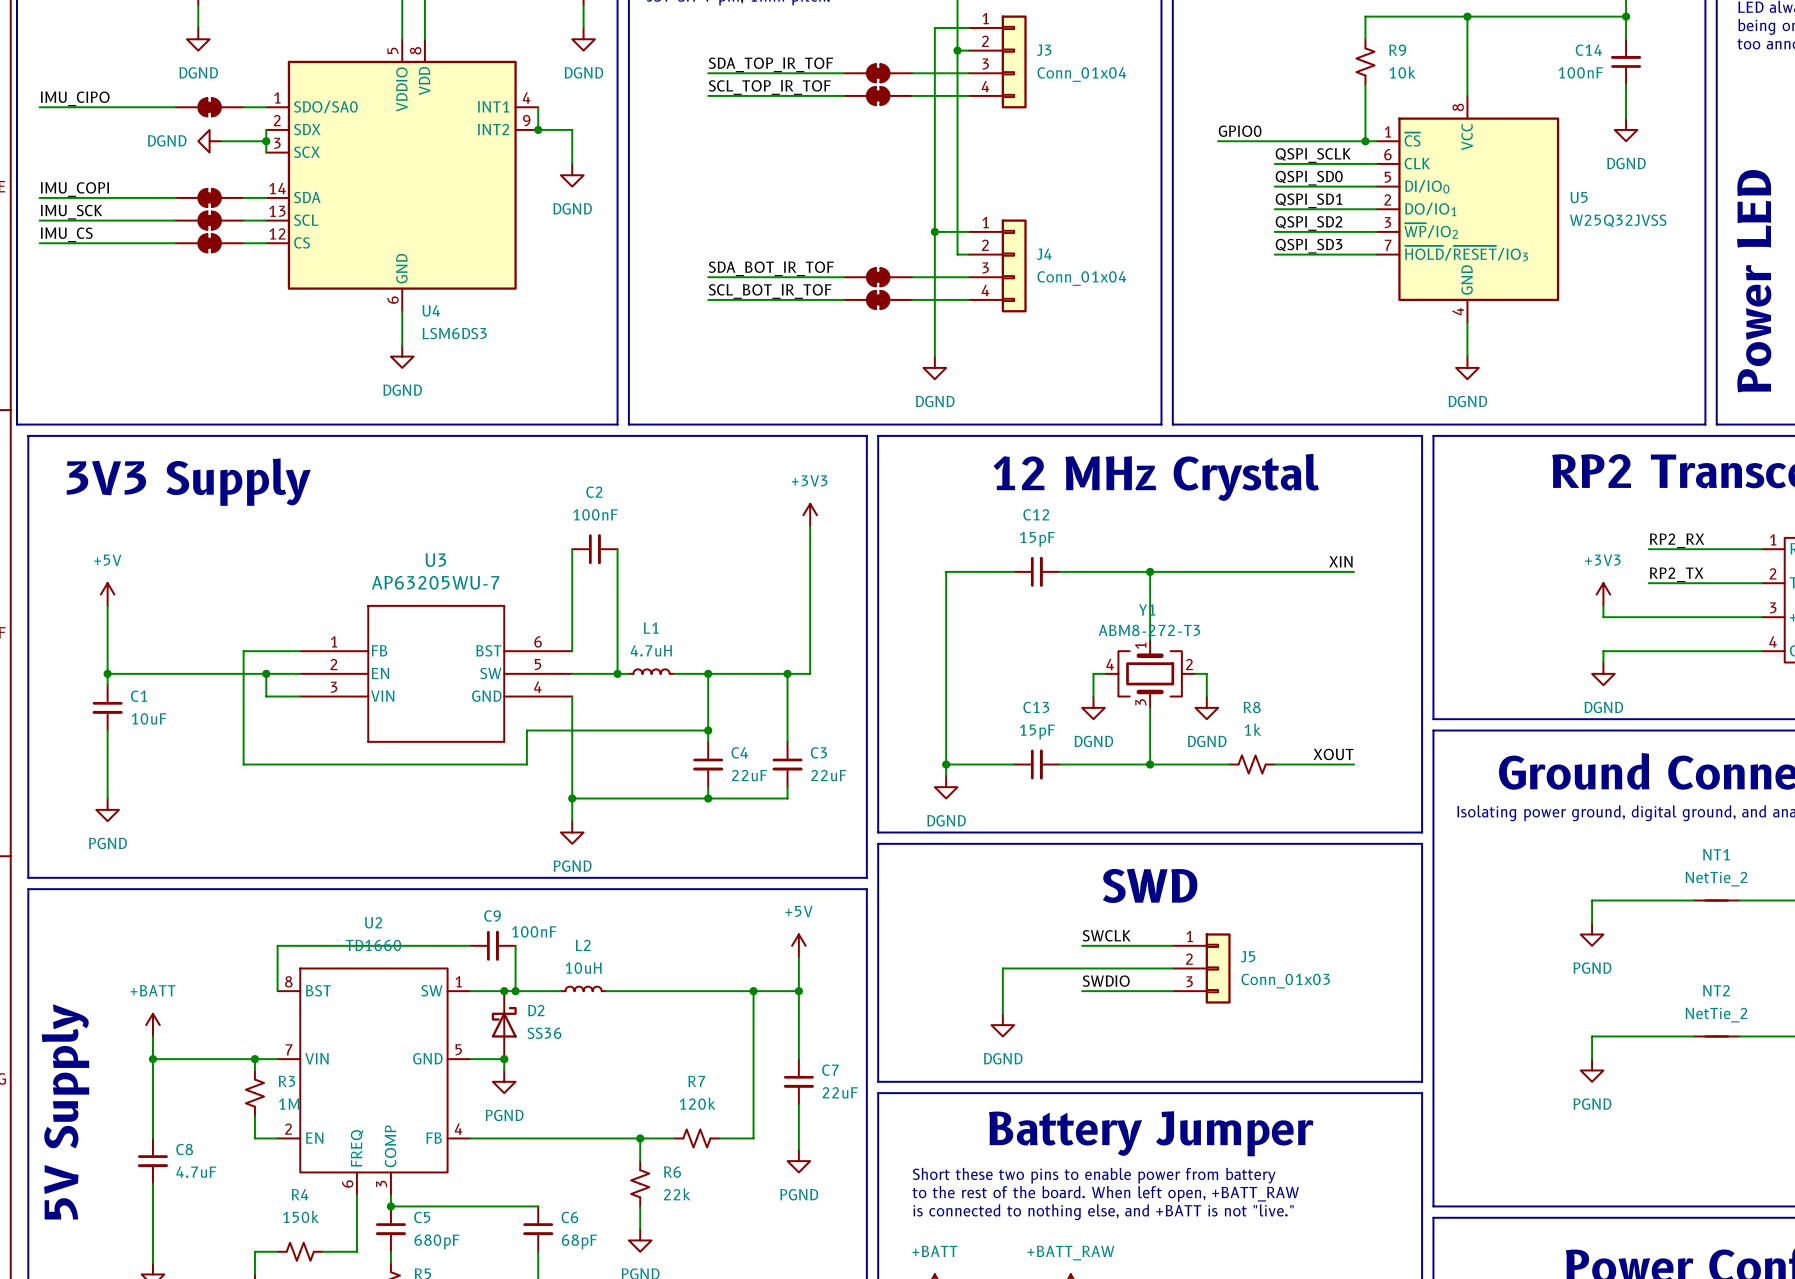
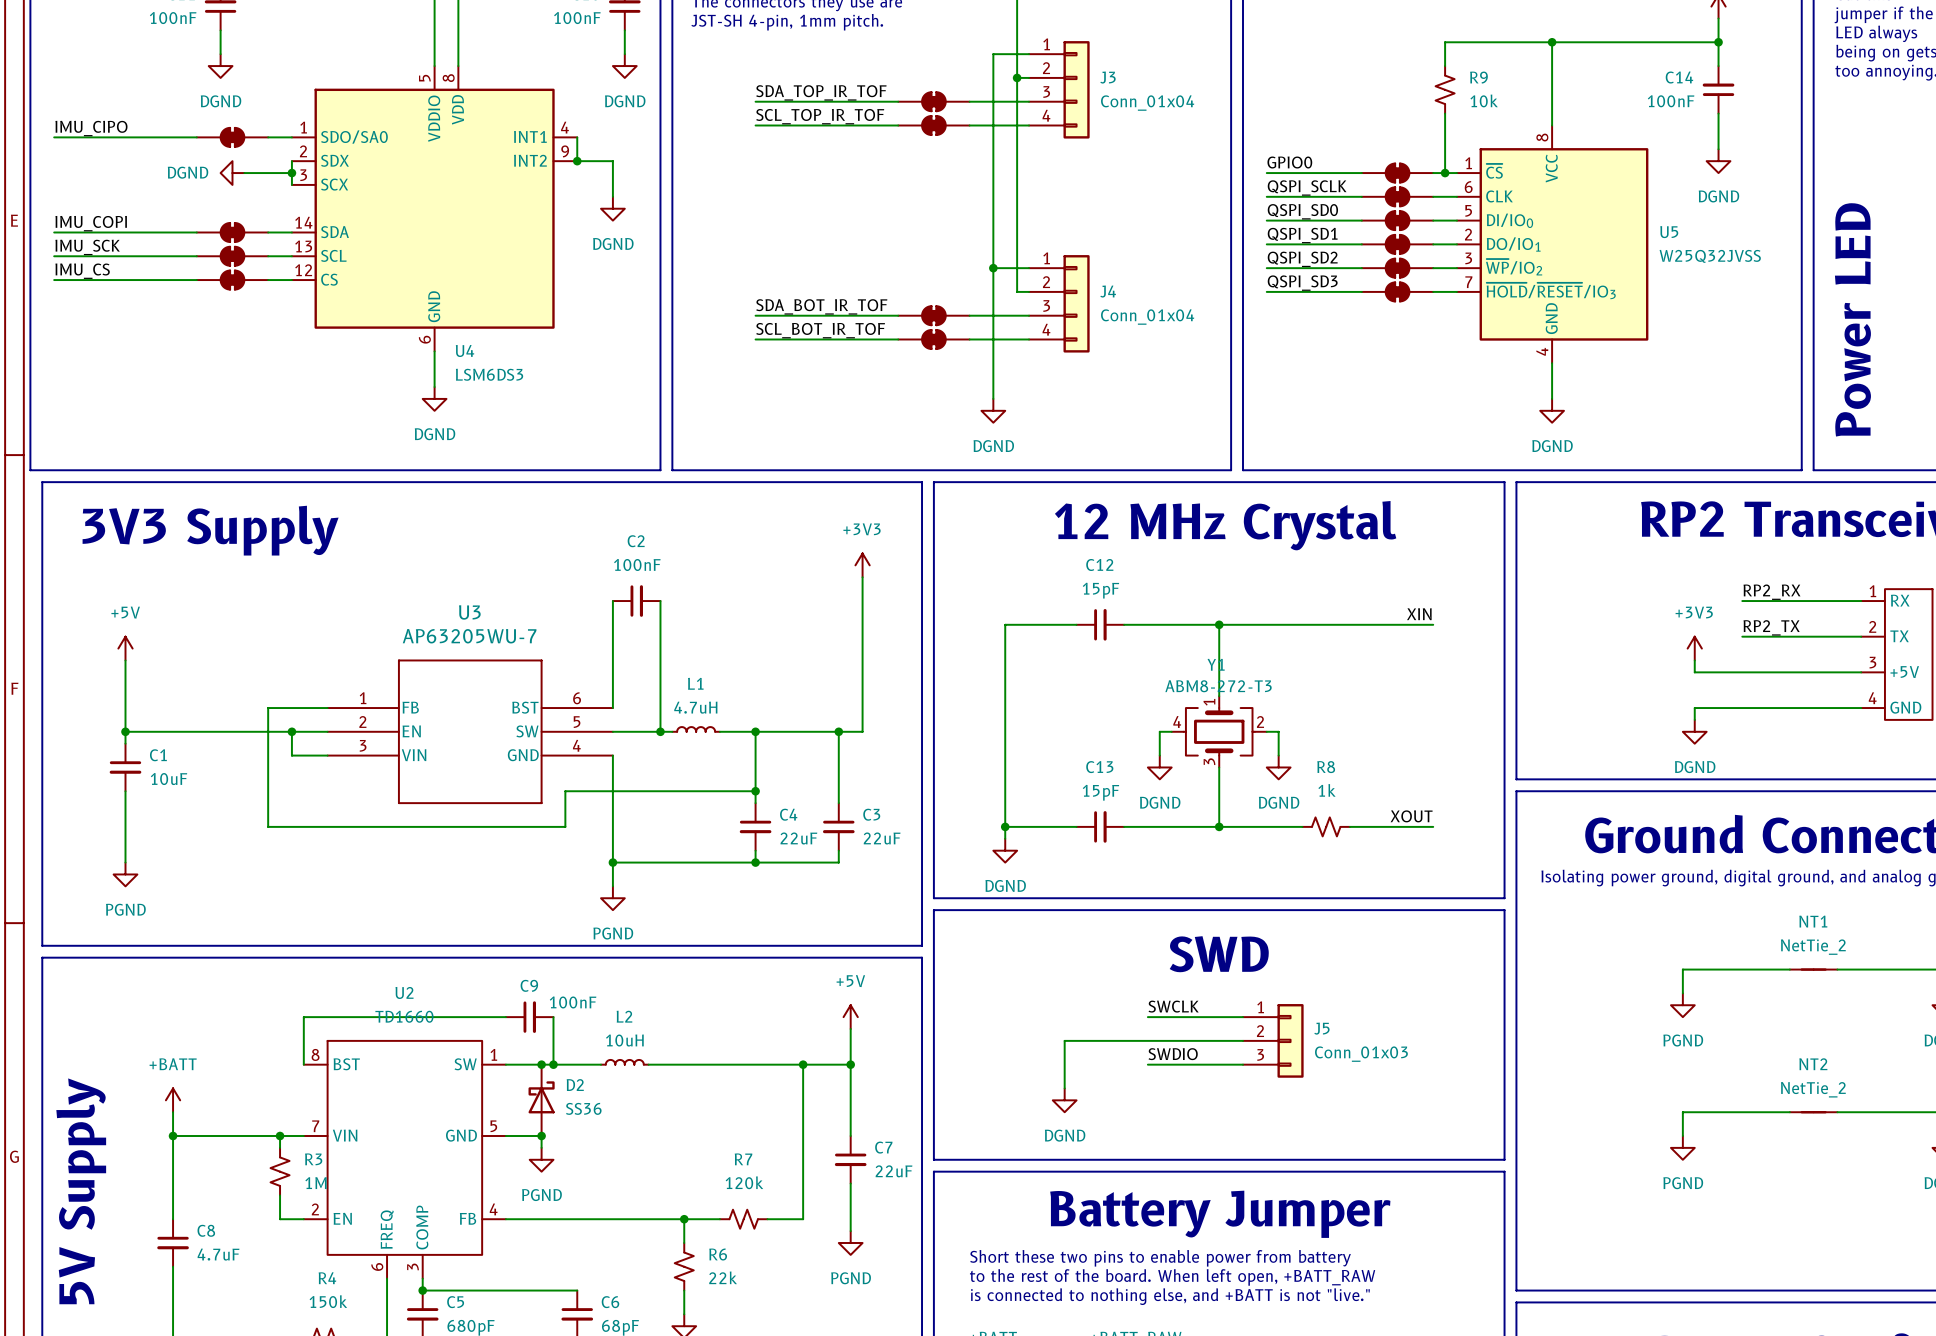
label position: GPIO0 (1240, 131) -> GPIO0 (1289, 162)
wire: none -> (1266, 173) (1290, 173)
part: none -> (1397, 173)
label position: QSPI_SCLK (1313, 155) -> QSPI_SCLK (1307, 187)
wire: none -> (1266, 196) (1349, 196)
part: none -> (1397, 196)
label position: QSPI_SD0 (1309, 178) -> QSPI_SD0 (1302, 211)
wire: none -> (1266, 220) (1349, 220)
part: none -> (1397, 220)
label position: QSPI_SD1 (1309, 200) -> QSPI_SD1 (1302, 235)
wire: none -> (1266, 244) (1349, 244)
part: none -> (1397, 244)
label position: QSPI_SD2 (1309, 223) -> QSPI_SD2 (1302, 259)
wire: none -> (1266, 268) (1349, 268)
part: none -> (1397, 268)
label position: QSPI_SD3 (1309, 246) -> QSPI_SD3 (1302, 283)
wire: none -> (1266, 291) (1349, 291)
part: none -> (1397, 291)

